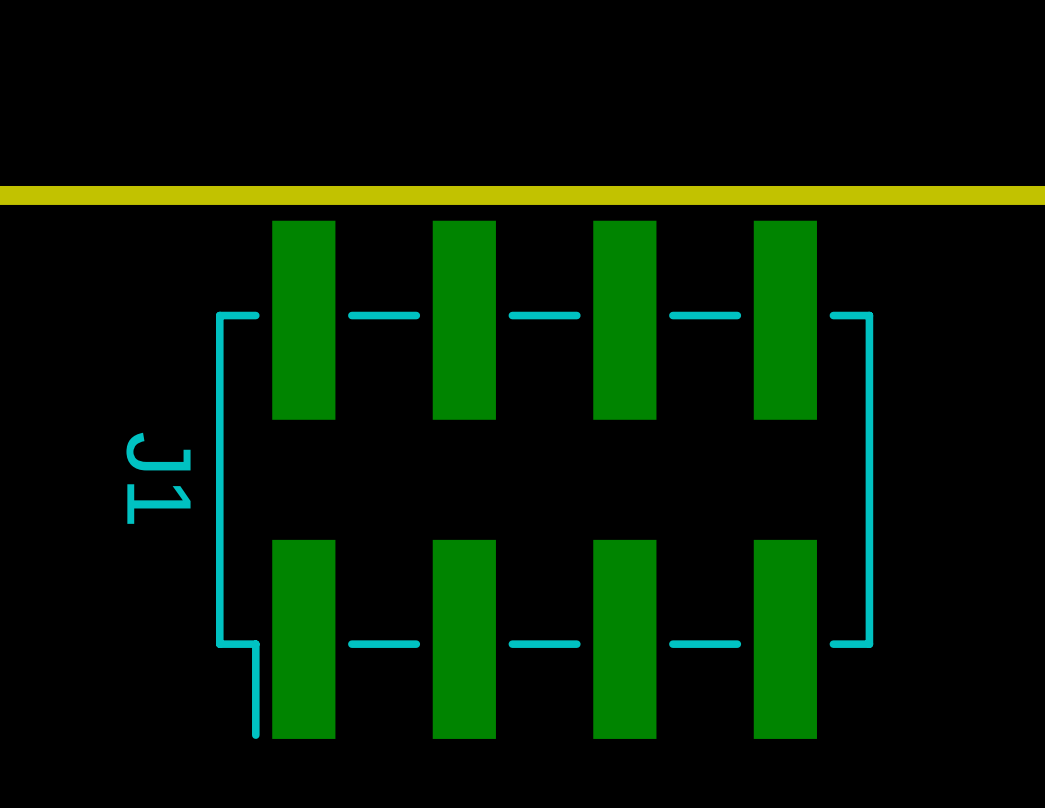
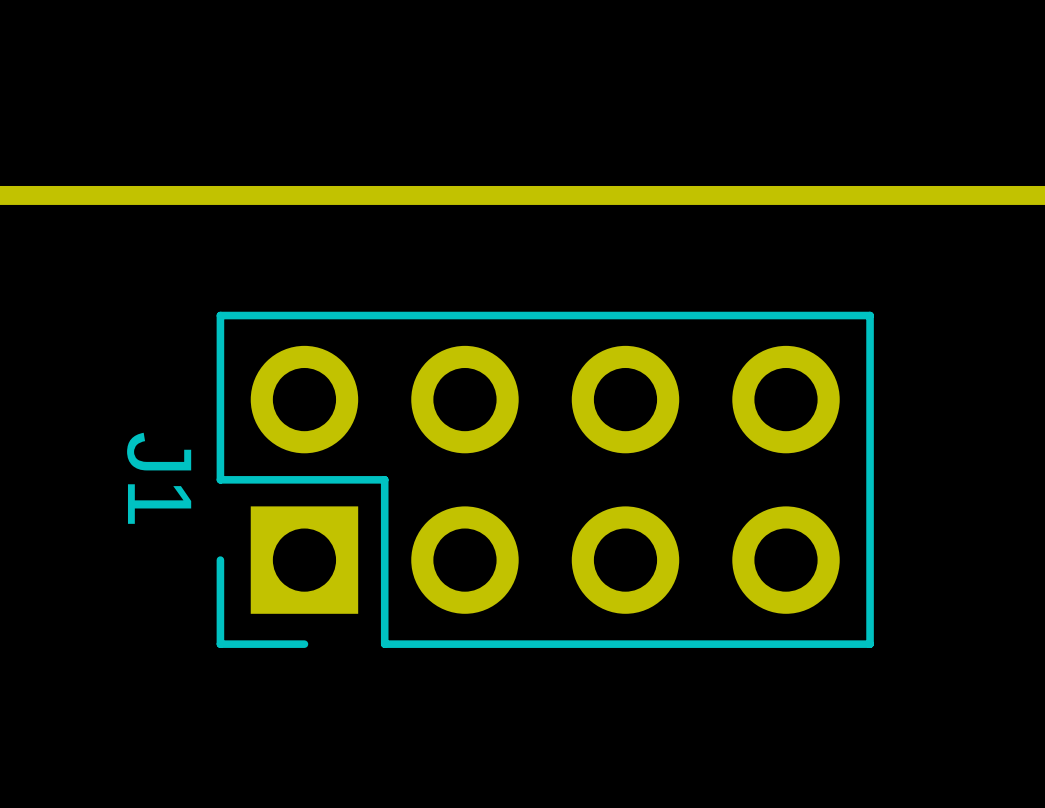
J1 footprint: [215, 220, 874, 739] -> [216, 311, 874, 648]

